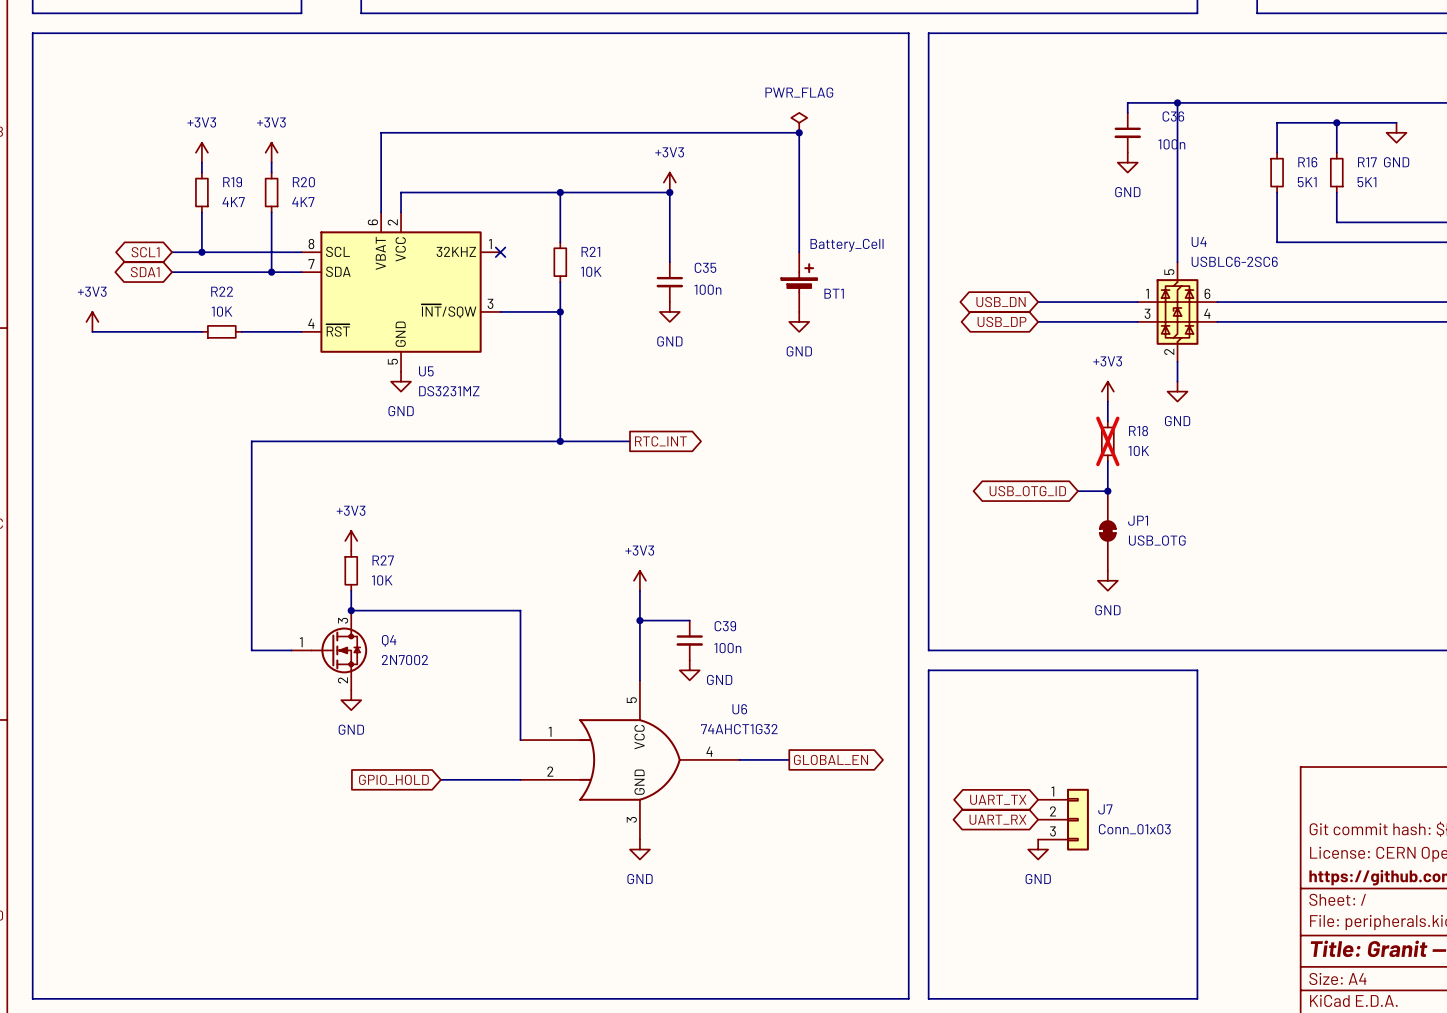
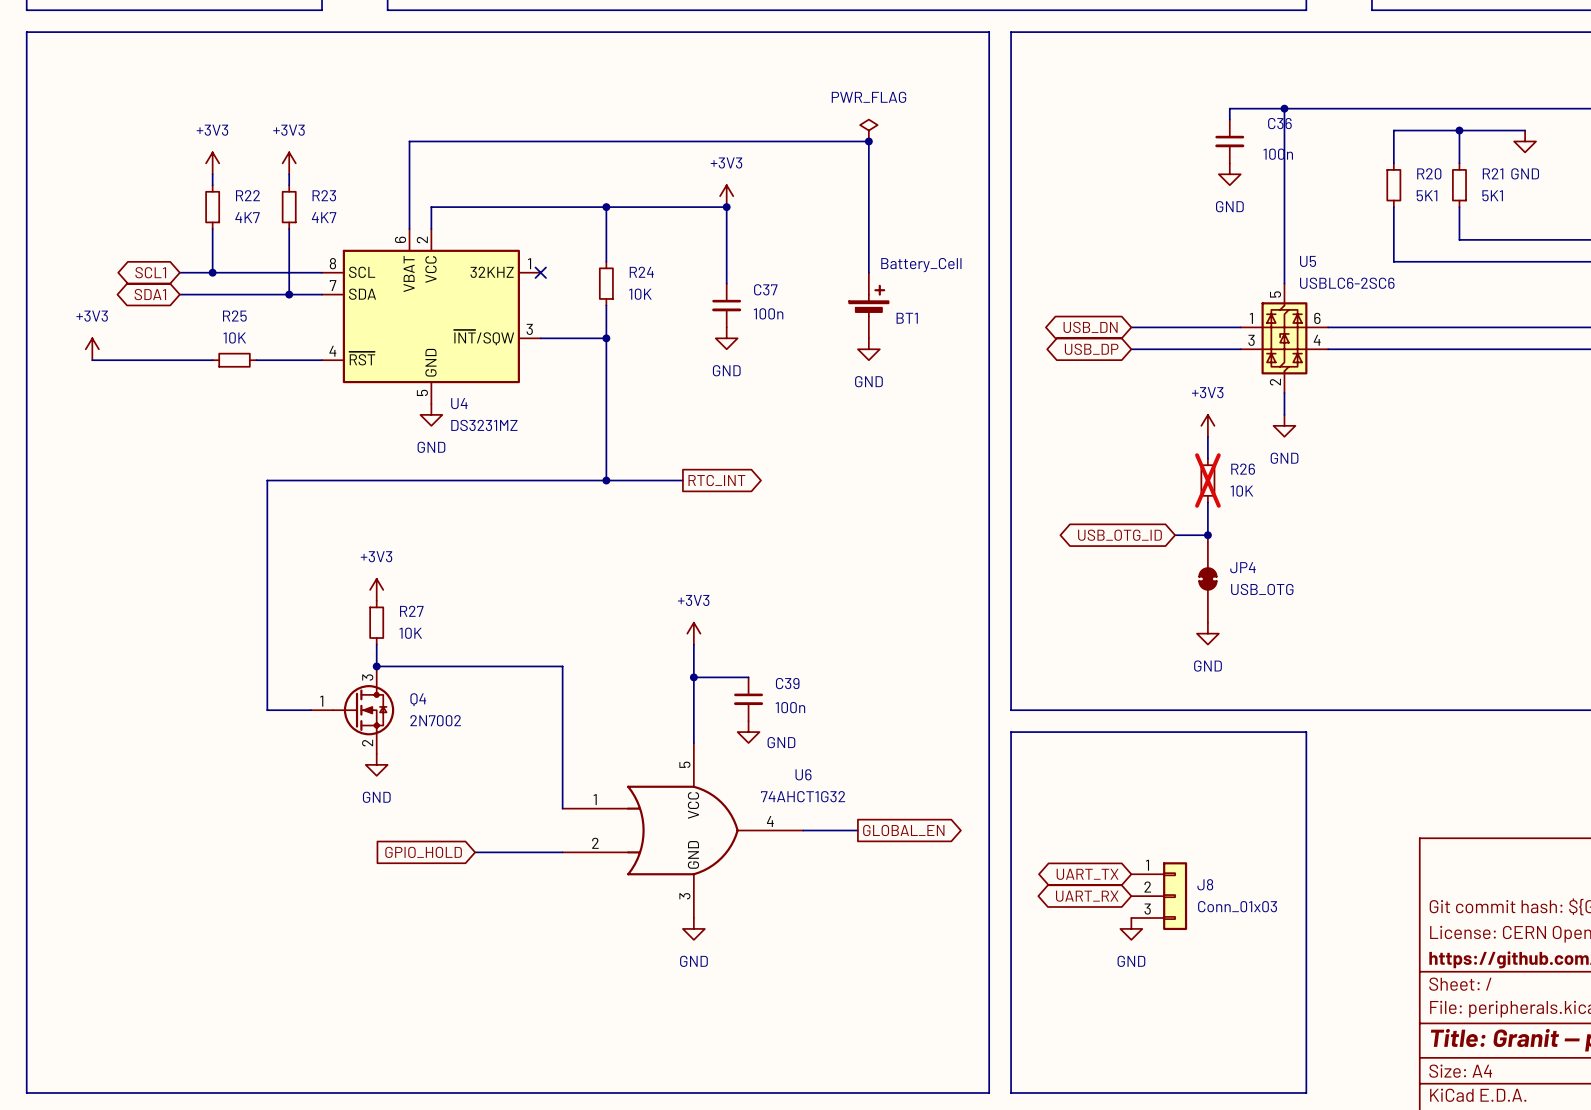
R16 name: R16 (1307, 162) -> R20 (1429, 173)
R17 name: R17 (1367, 162) -> R21 (1493, 173)
R19 name: R19 (232, 182) -> R22 (247, 195)
R20 name: R20 (303, 182) -> R23 (324, 195)
U4 name: U4 (1199, 241) -> U5 (1308, 261)
R21 name: R21 (590, 251) -> R24 (641, 272)
C35 name: C35 (705, 267) -> C37 (765, 289)
R22 name: R22 (222, 291) -> R25 (234, 316)
U5 name: U5 (426, 371) -> U4 (459, 403)
R18 name: R18 (1138, 431) -> R26 (1243, 469)
JP1 name: JP1 (1138, 520) -> JP4 (1242, 567)
J7 name: J7 (1105, 809) -> J8 (1205, 884)

